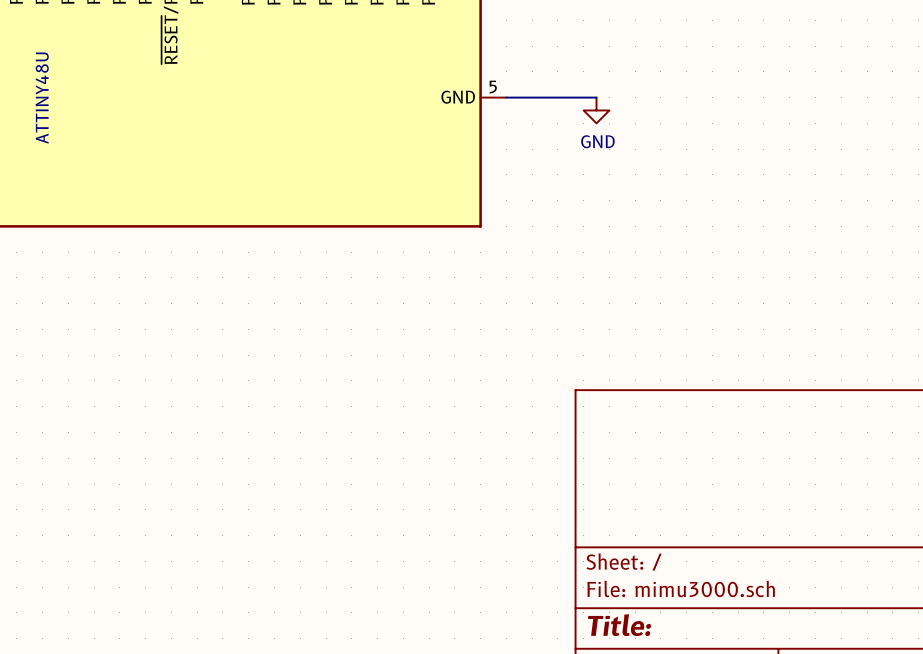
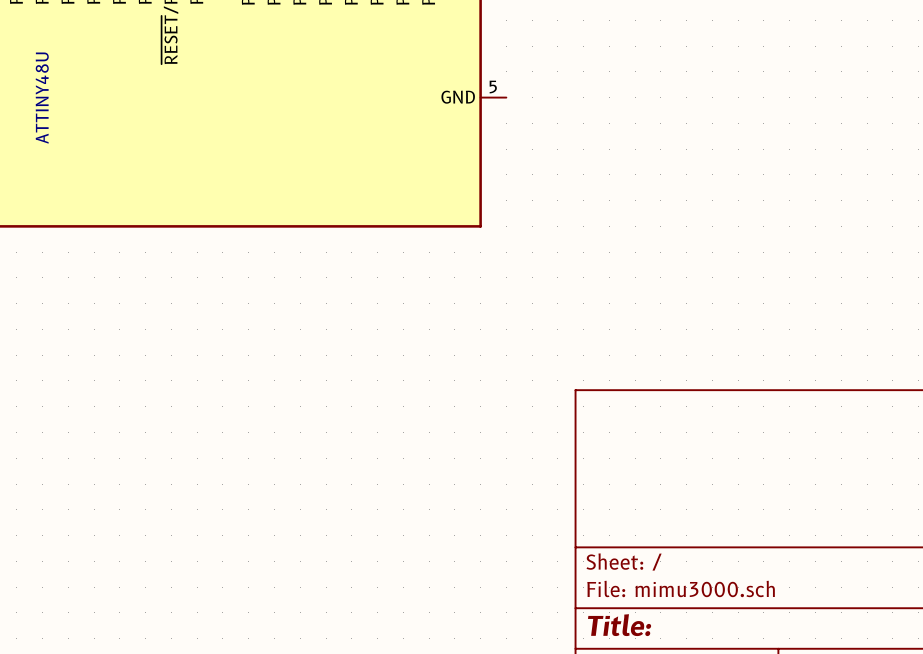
wire: (506, 97) (596, 97) -> none
power symbol: GND (596, 110) -> none

